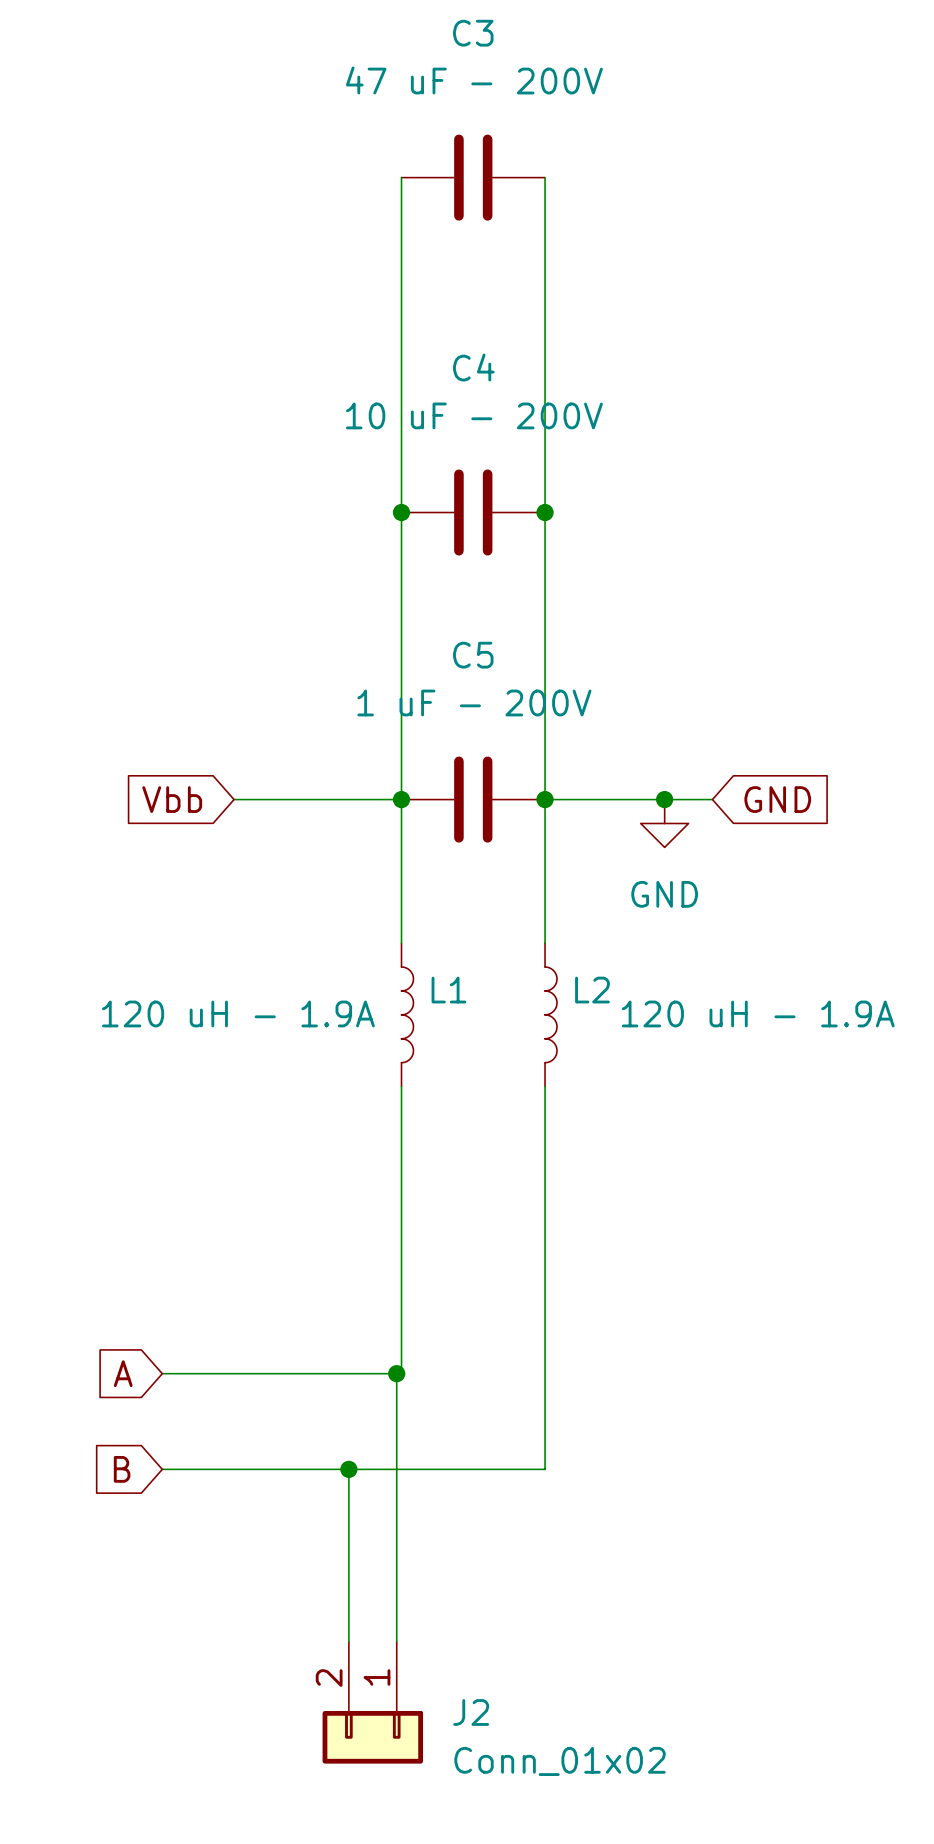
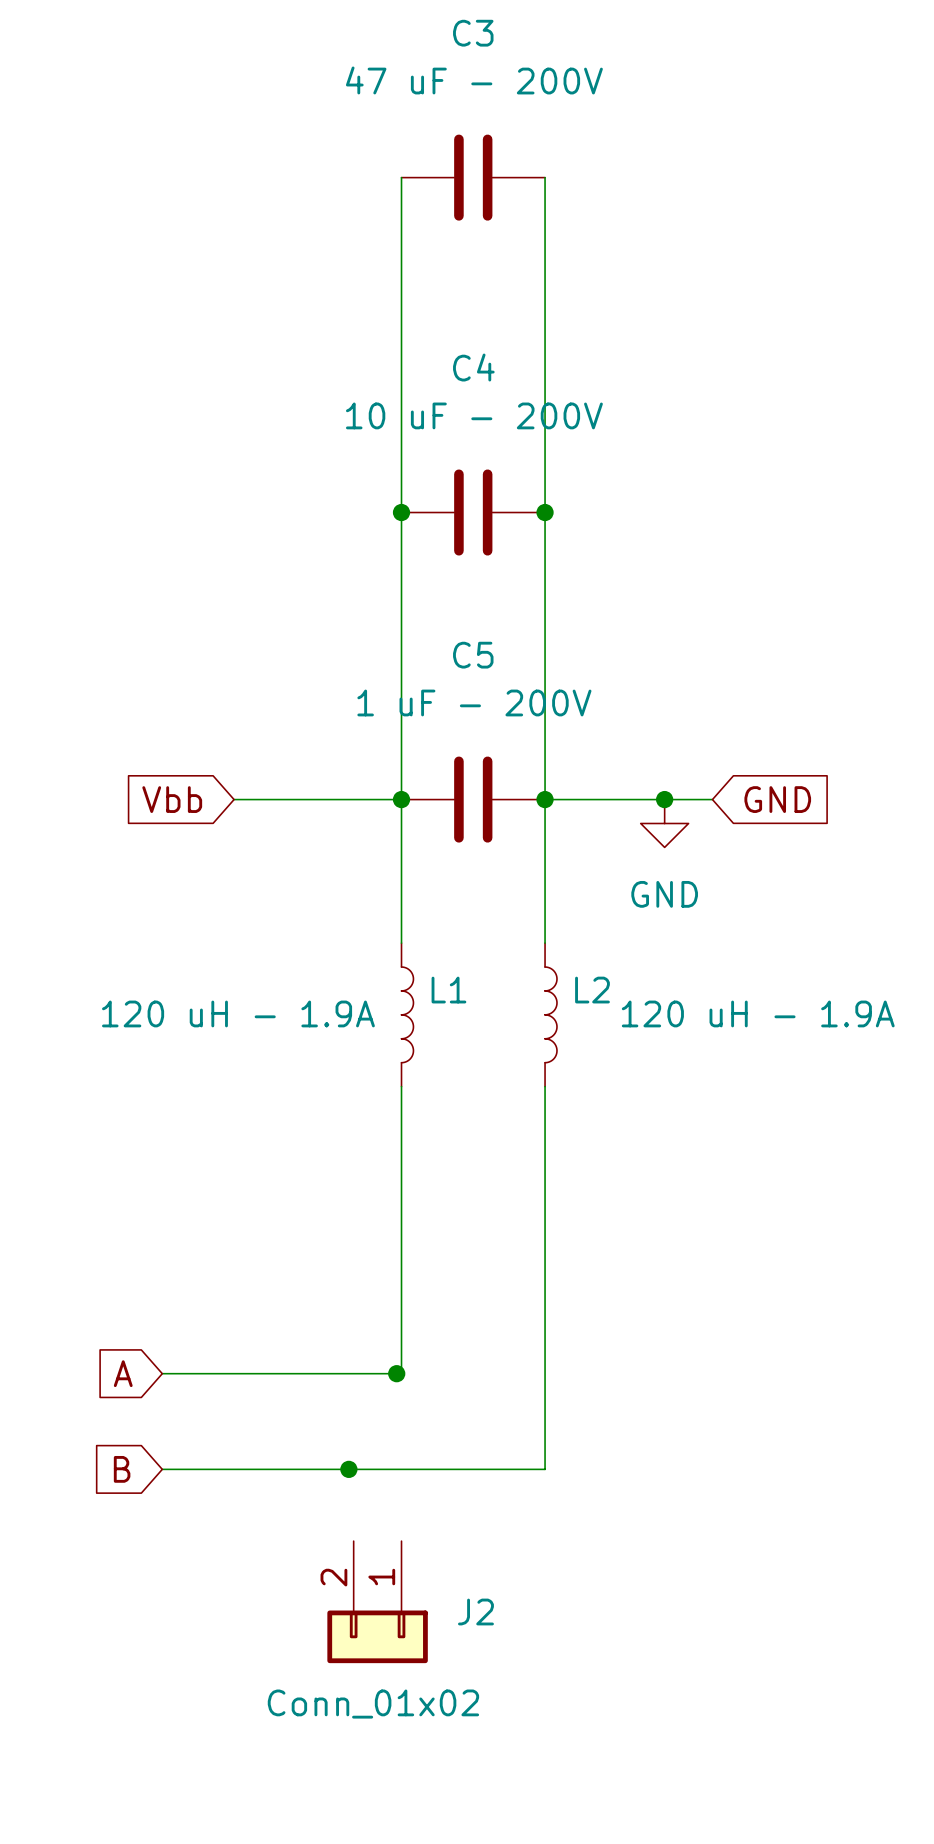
wire: (396, 1373) (396, 1641) -> none
wire: (348, 1469) (348, 1641) -> none
J2 position: (372, 1702) -> (377, 1602)
J2 value position: Conn_01x02 (560, 1761) -> Conn_01x02 (373, 1704)

